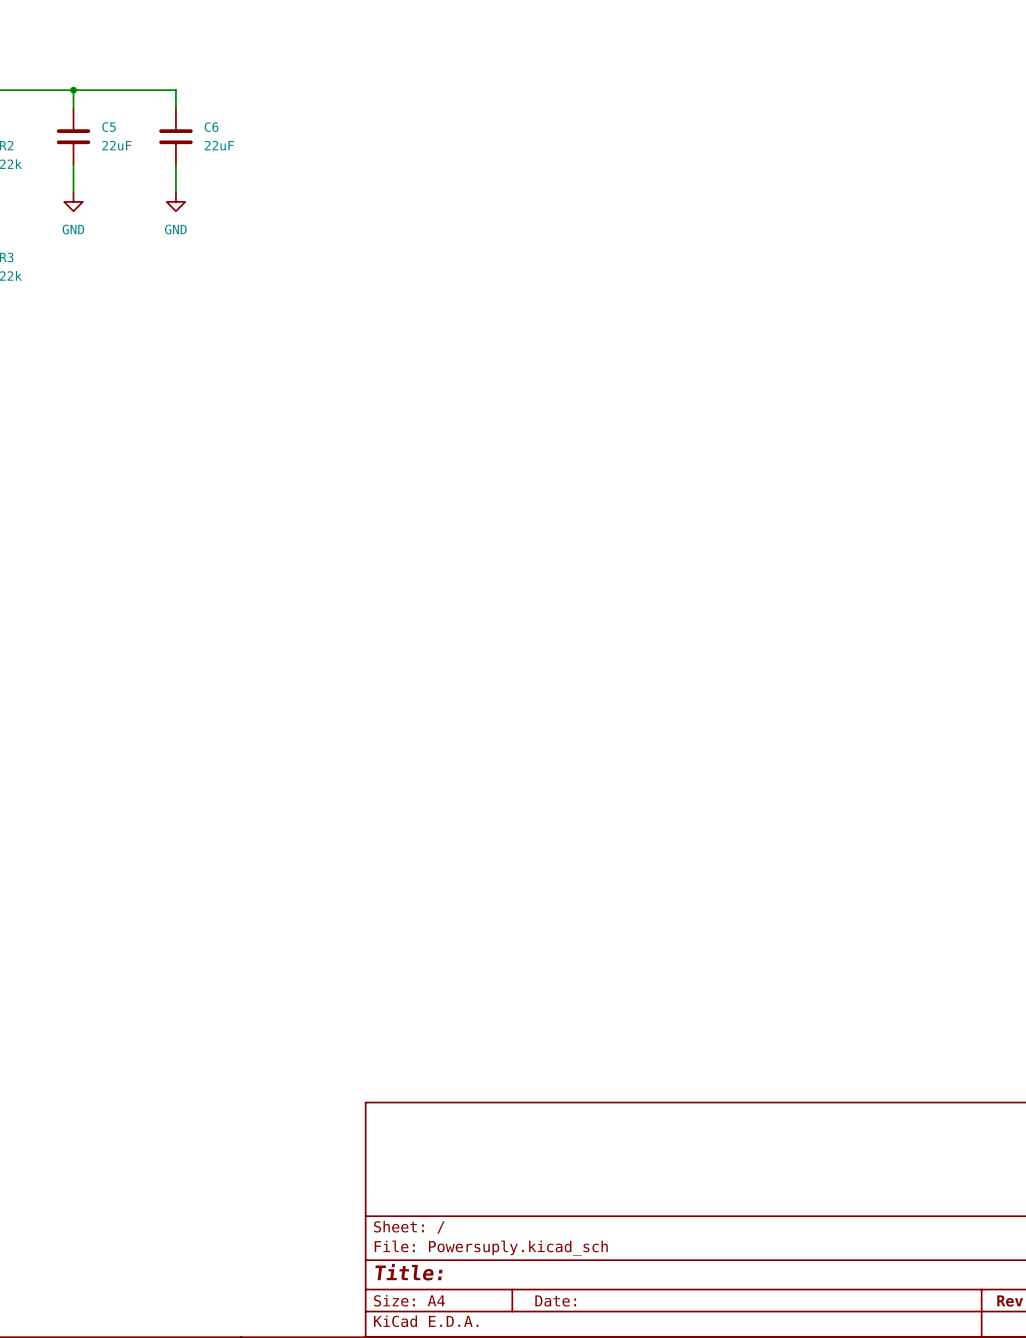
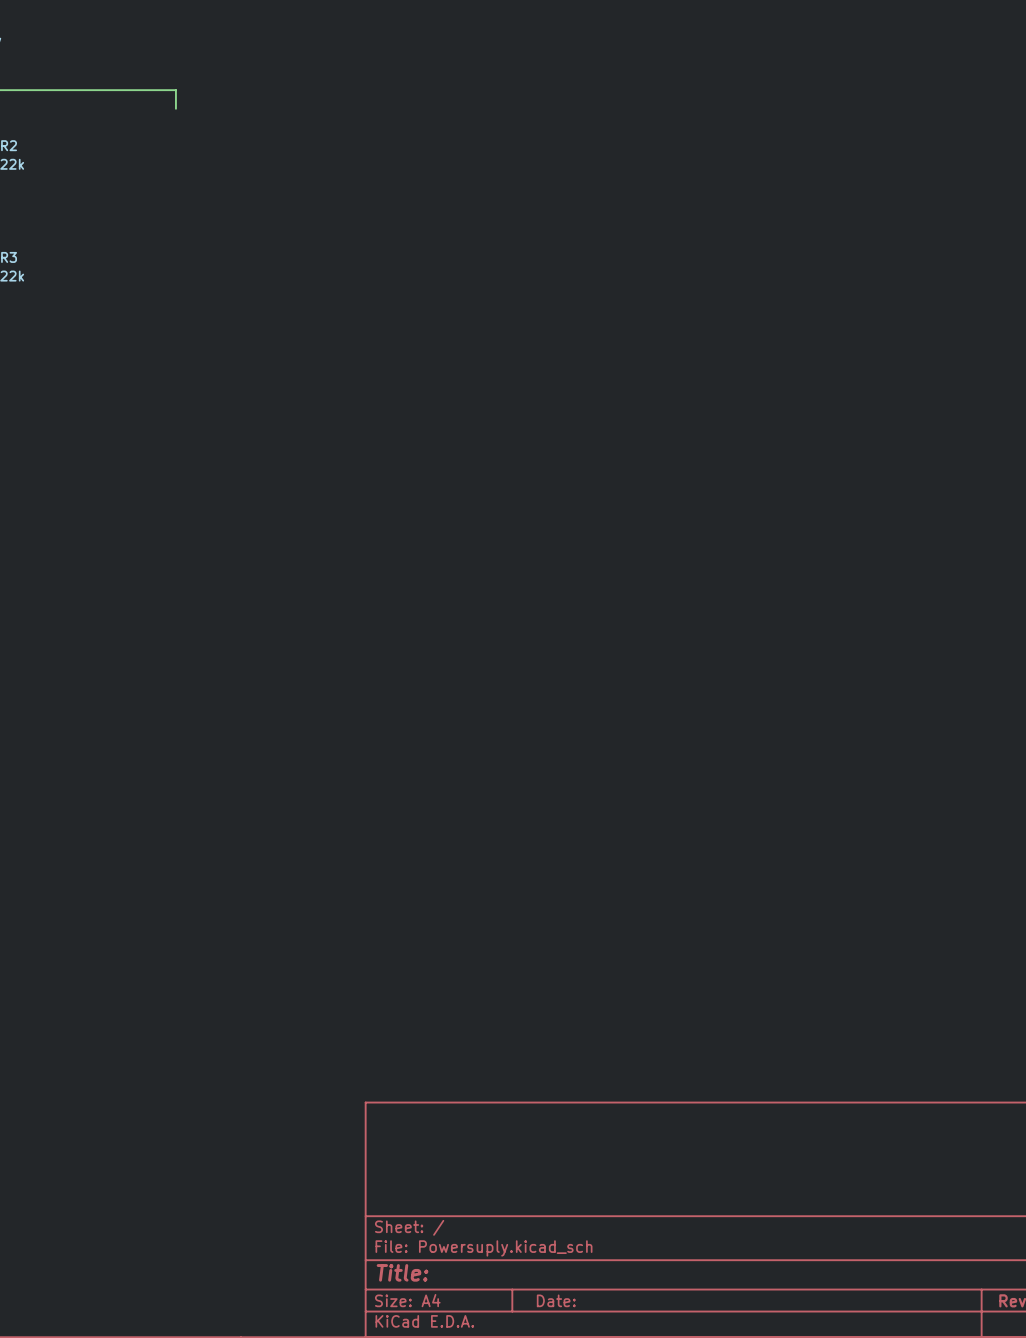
wire: (73, 90) (73, 108) -> none
junction: (73, 90) -> none
C5: 22uF (73, 136) -> none
C6: 22uF (175, 136) -> none
wire: (73, 164) (73, 192) -> none
wire: (175, 164) (175, 192) -> none
power symbol: GND (73, 201) -> none
power symbol: GND (175, 201) -> none

